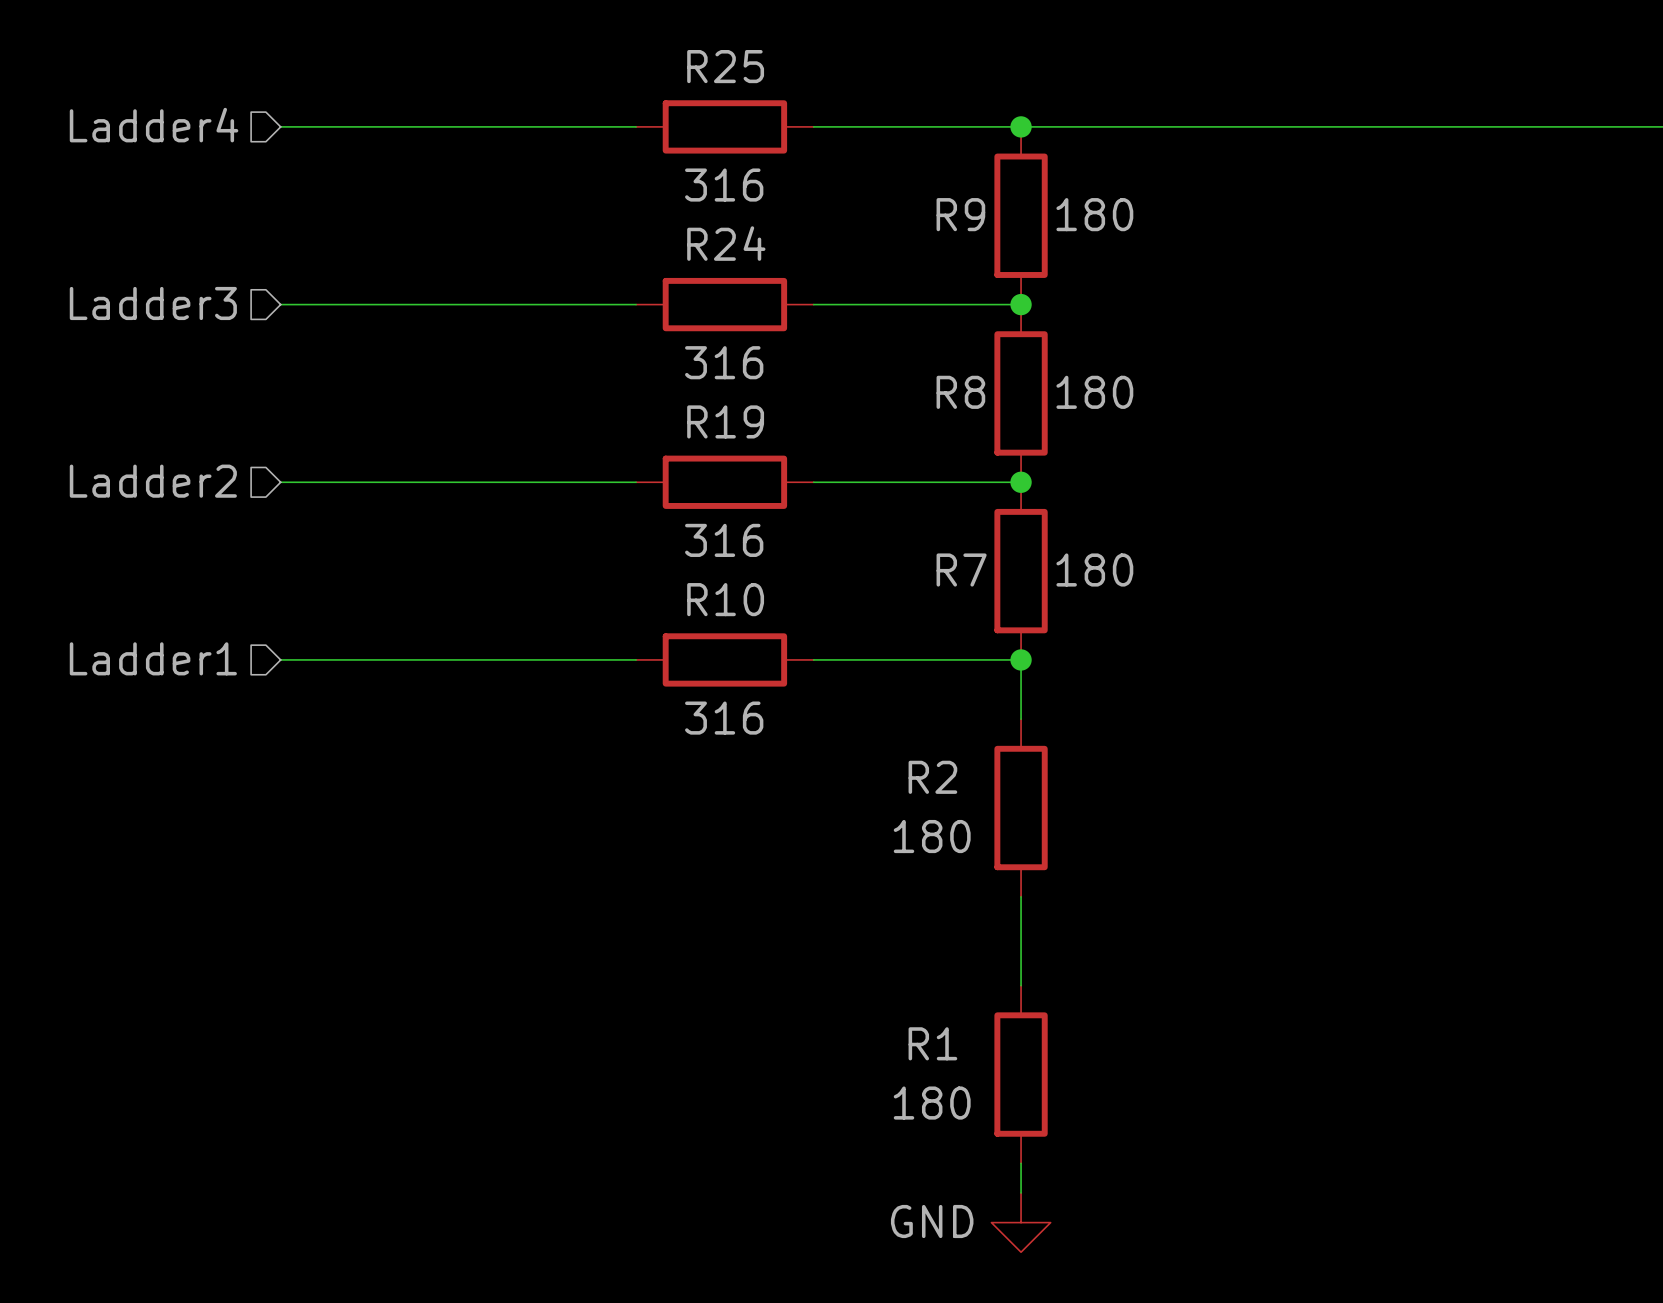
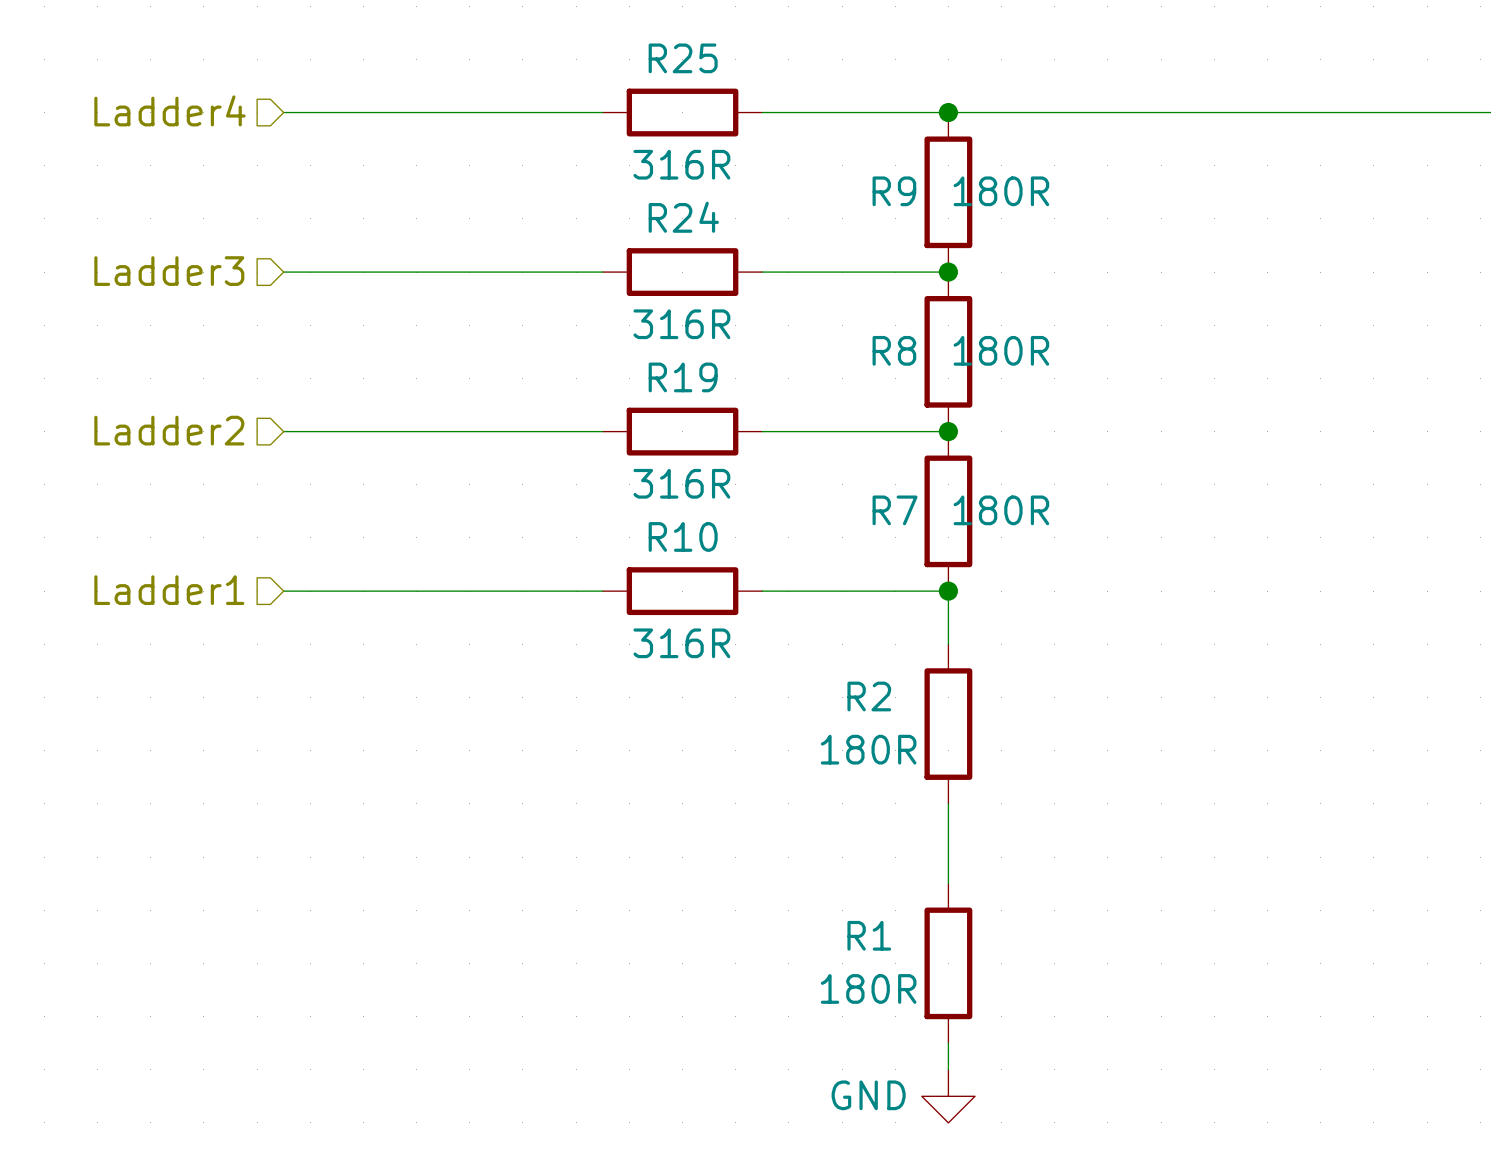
R25 value: 316 (724, 185) -> 316R (681, 164)
R9 value: 180 (1094, 214) -> 180R (1001, 191)
R24 value: 316 (724, 362) -> 316R (681, 324)
R8 value: 180 (1094, 392) -> 180R (1001, 350)
R19 value: 316 (724, 540) -> 316R (681, 483)
R7 value: 180 (1094, 570) -> 180R (1001, 510)
R10 value: 316 (724, 718) -> 316R (681, 643)
R2 value: 180 (932, 836) -> 180R (868, 749)
R1 value: 180 (932, 1103) -> 180R (868, 988)

